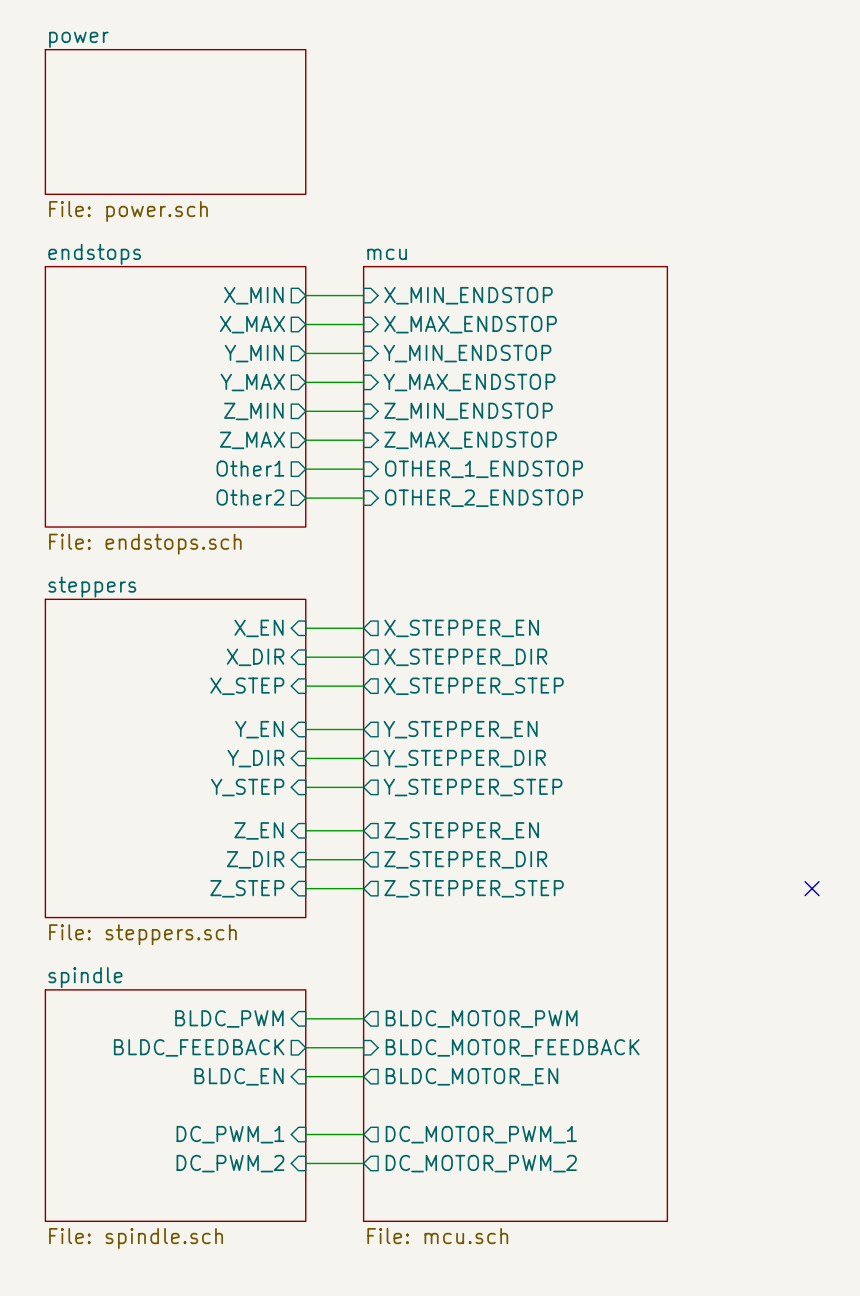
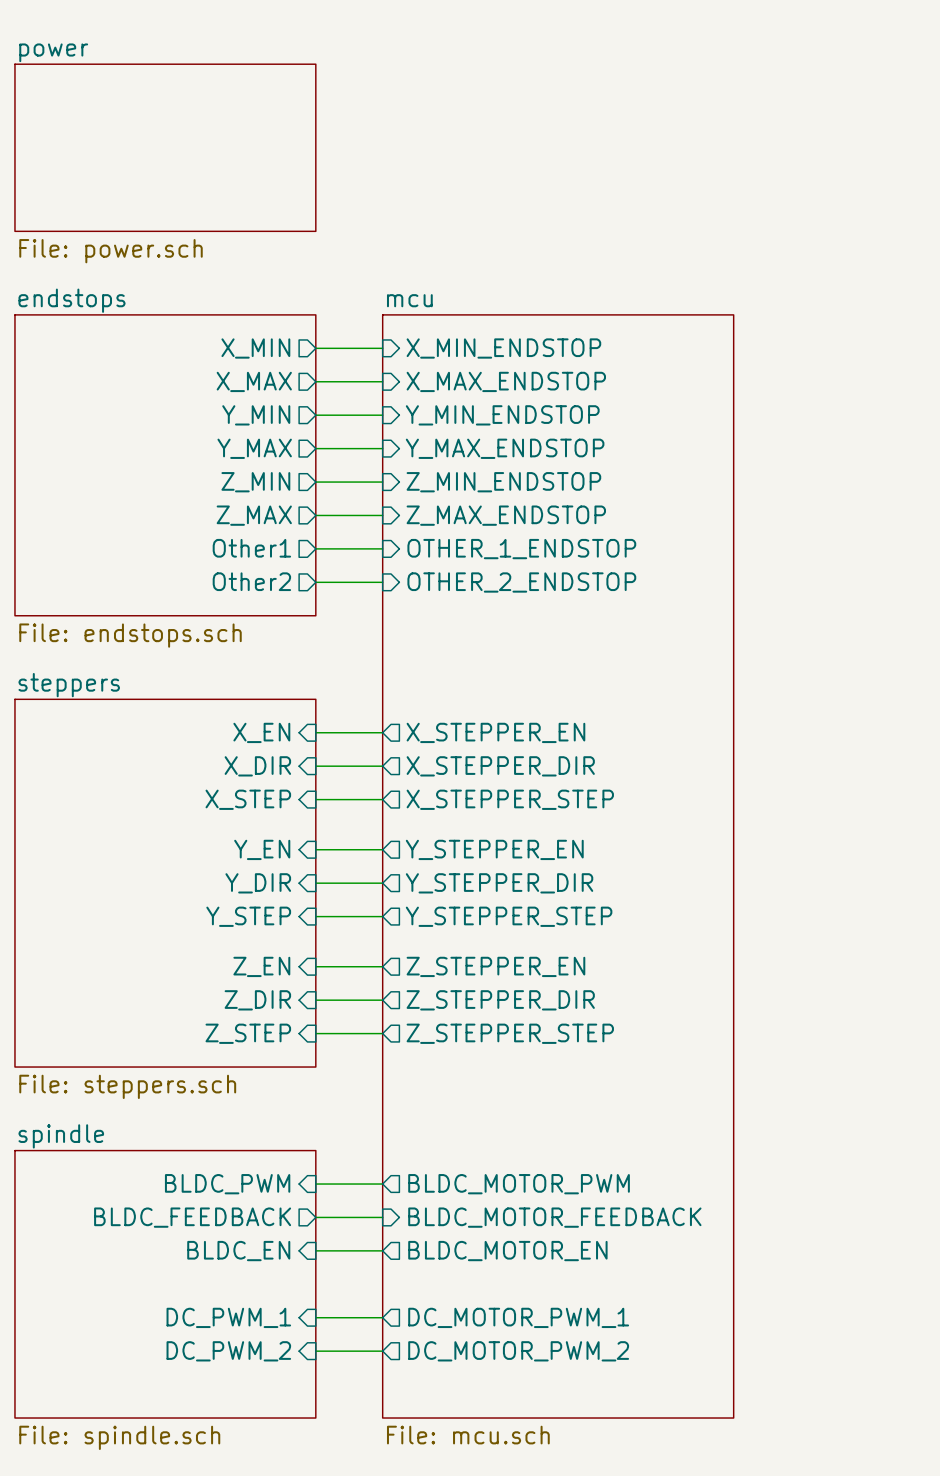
no-connect mark: (812, 888) -> none

